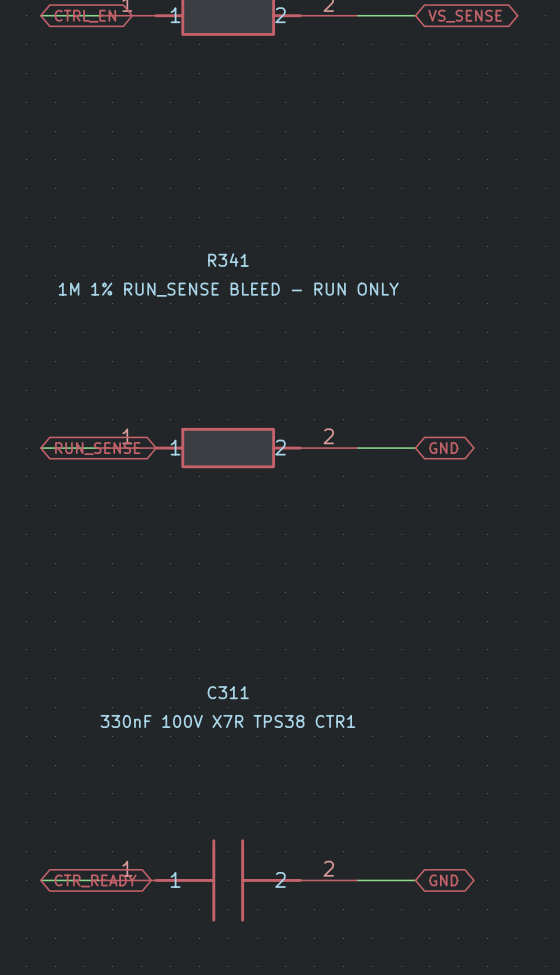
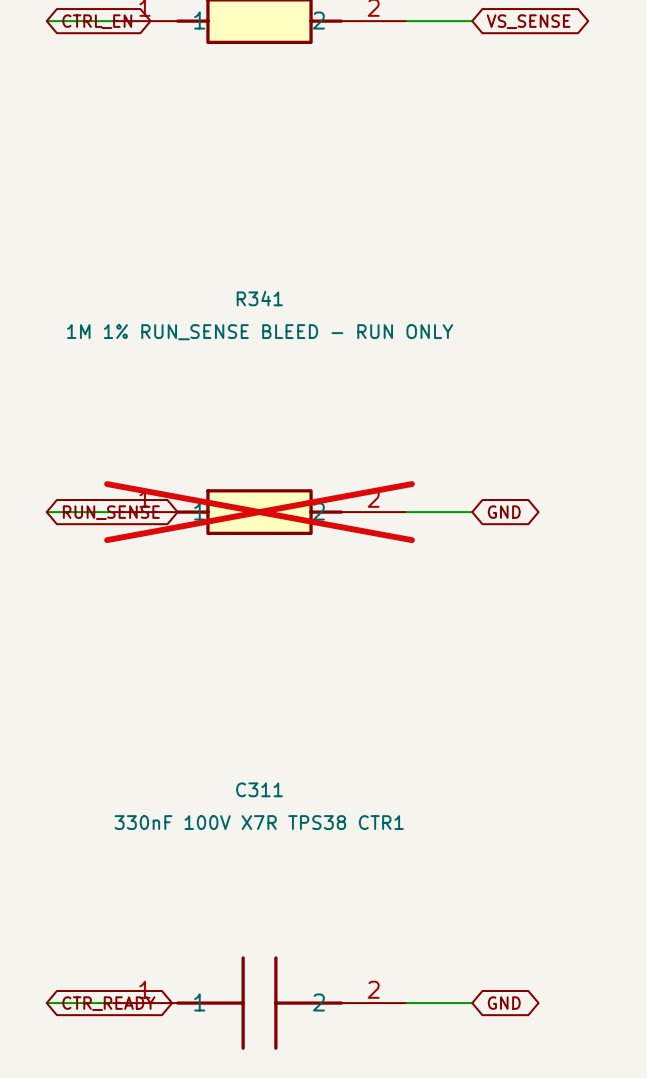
R341 do-not-place cross: none -> (259, 512)

